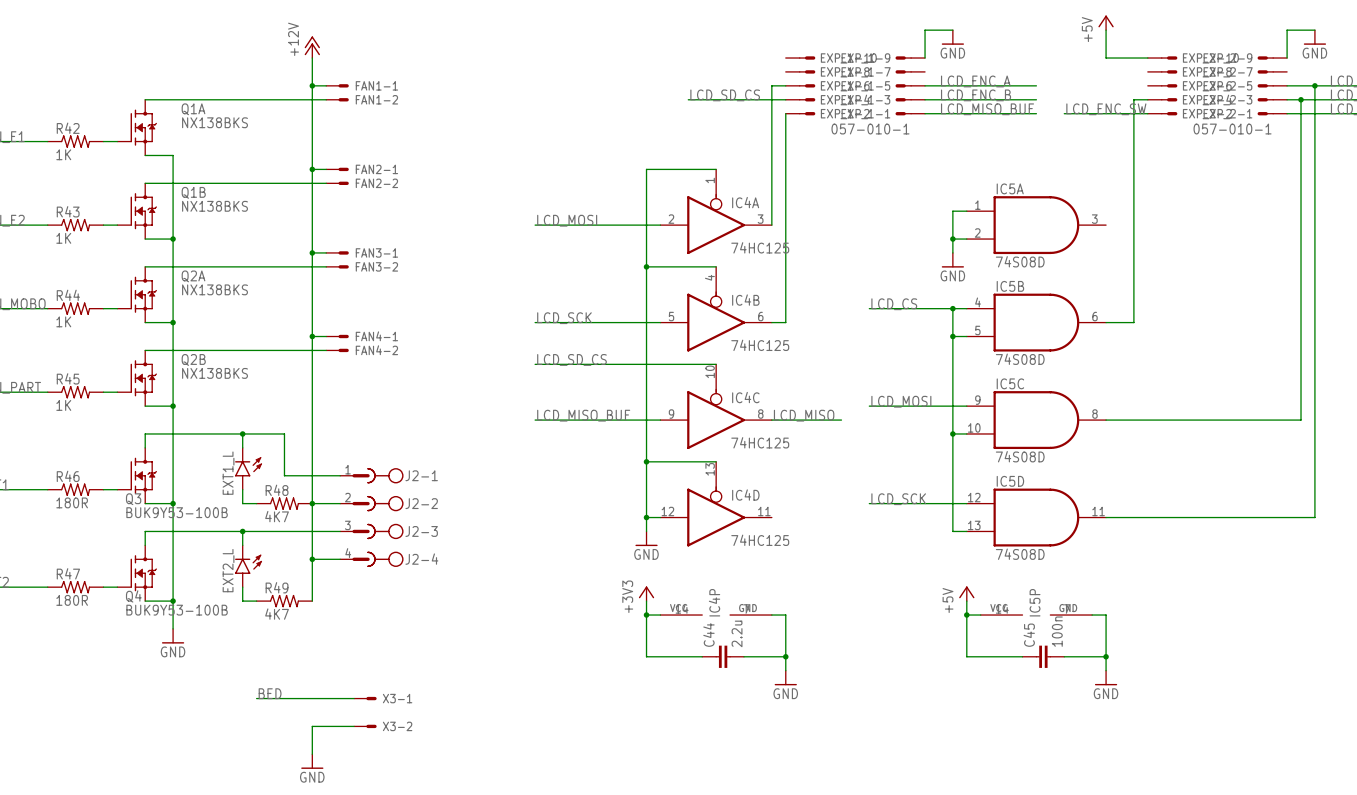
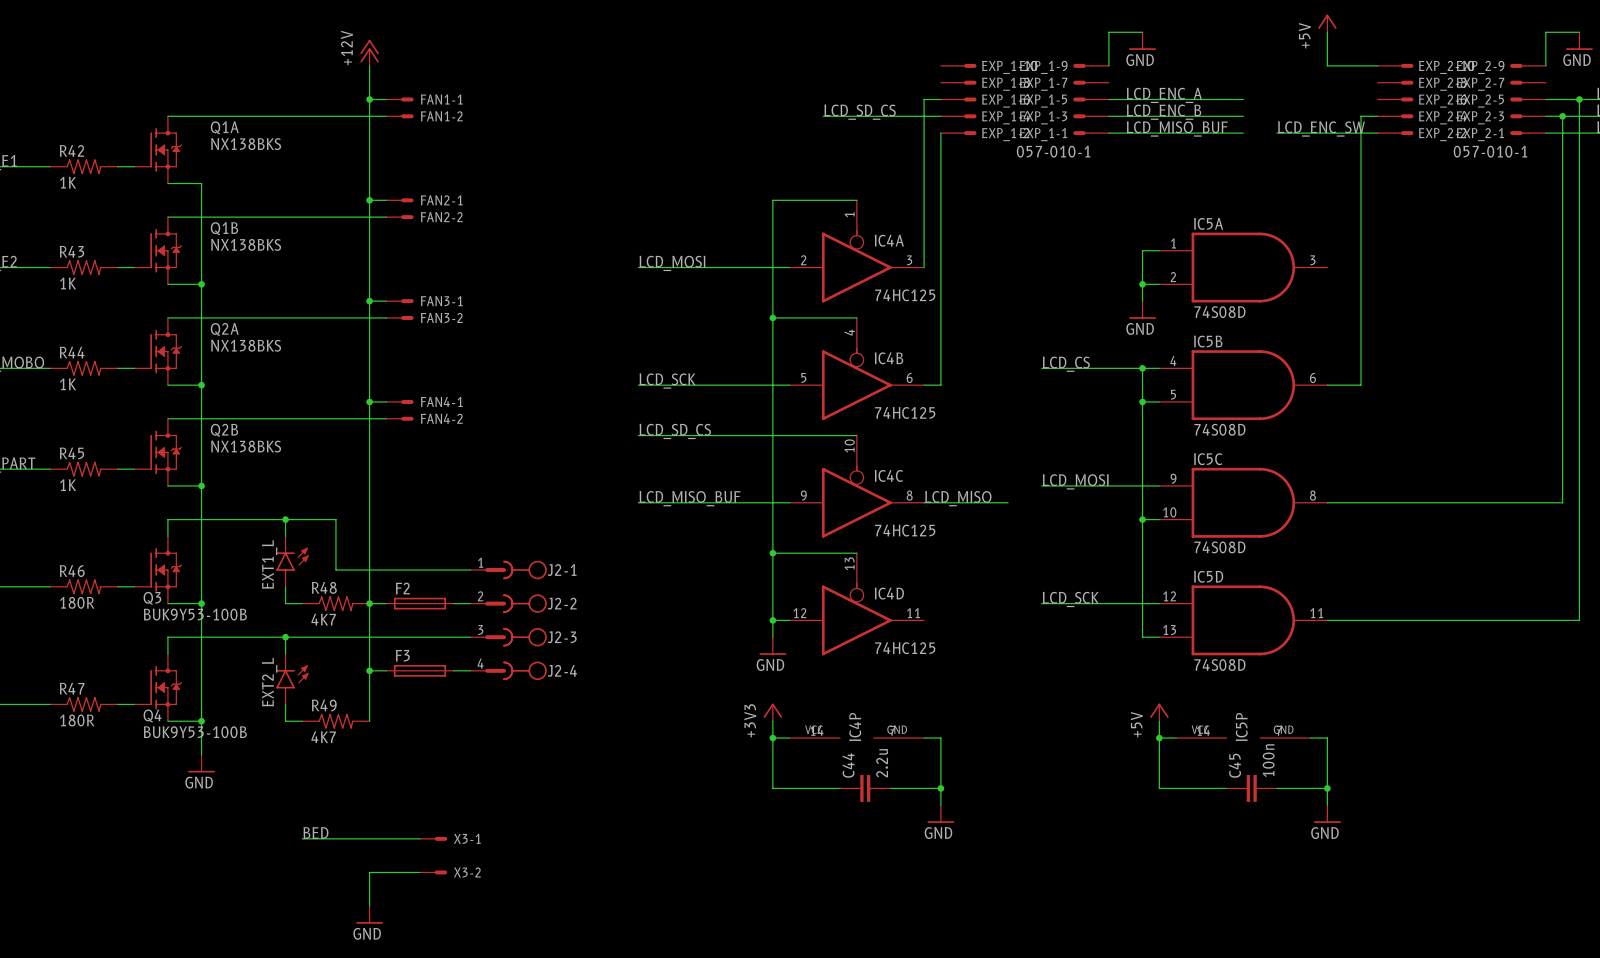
J2-1 position: (371, 475) -> (508, 570)
F2: none -> (419, 603)
J2-2 position: (371, 503) -> (508, 603)
J2-3 position: (371, 531) -> (508, 637)
F3: none -> (419, 670)
J2-4 position: (371, 559) -> (508, 670)

